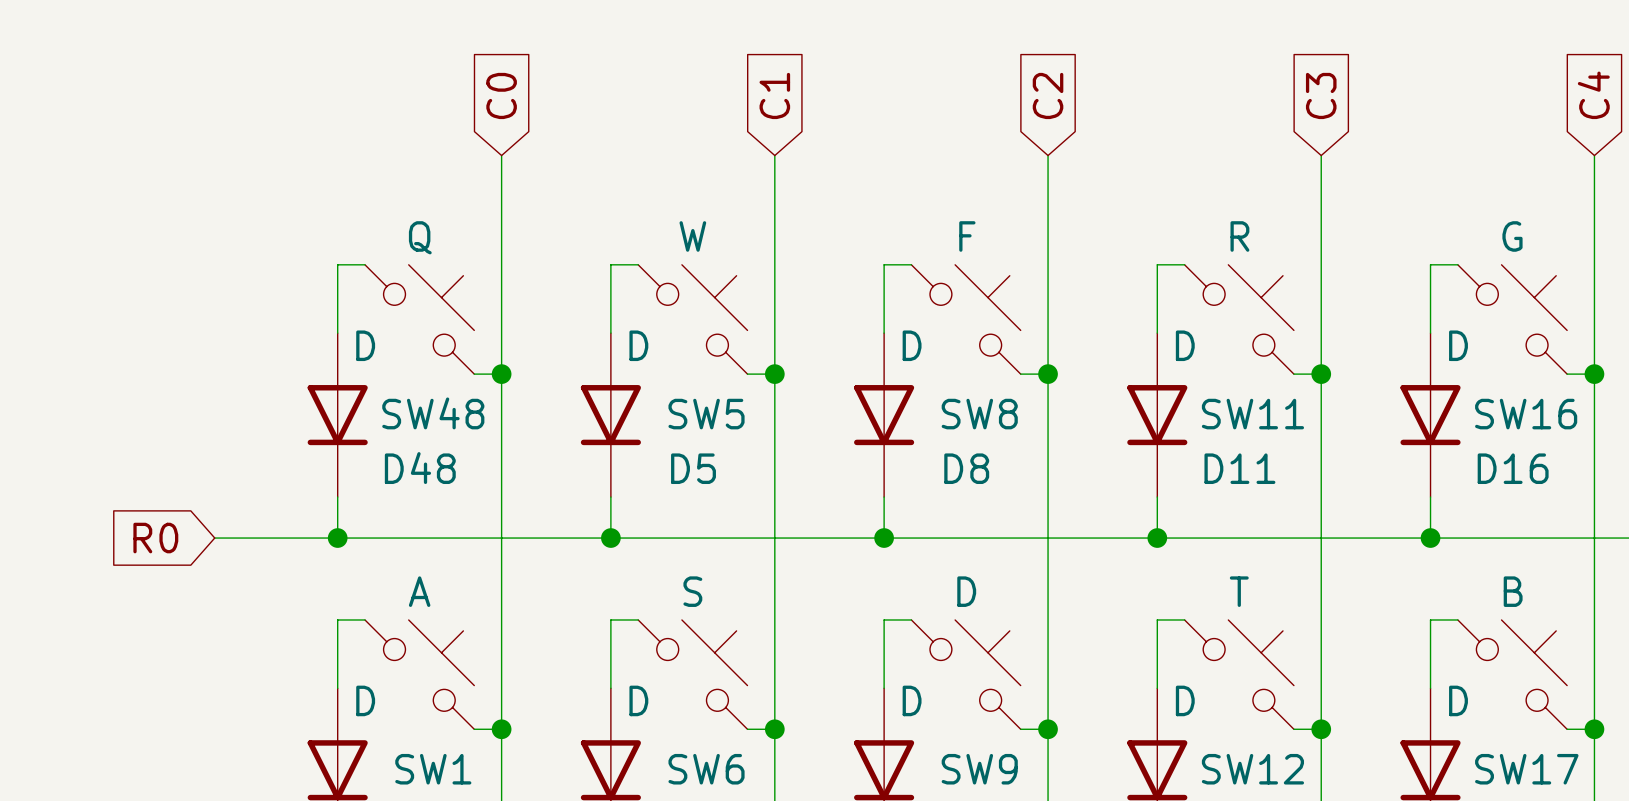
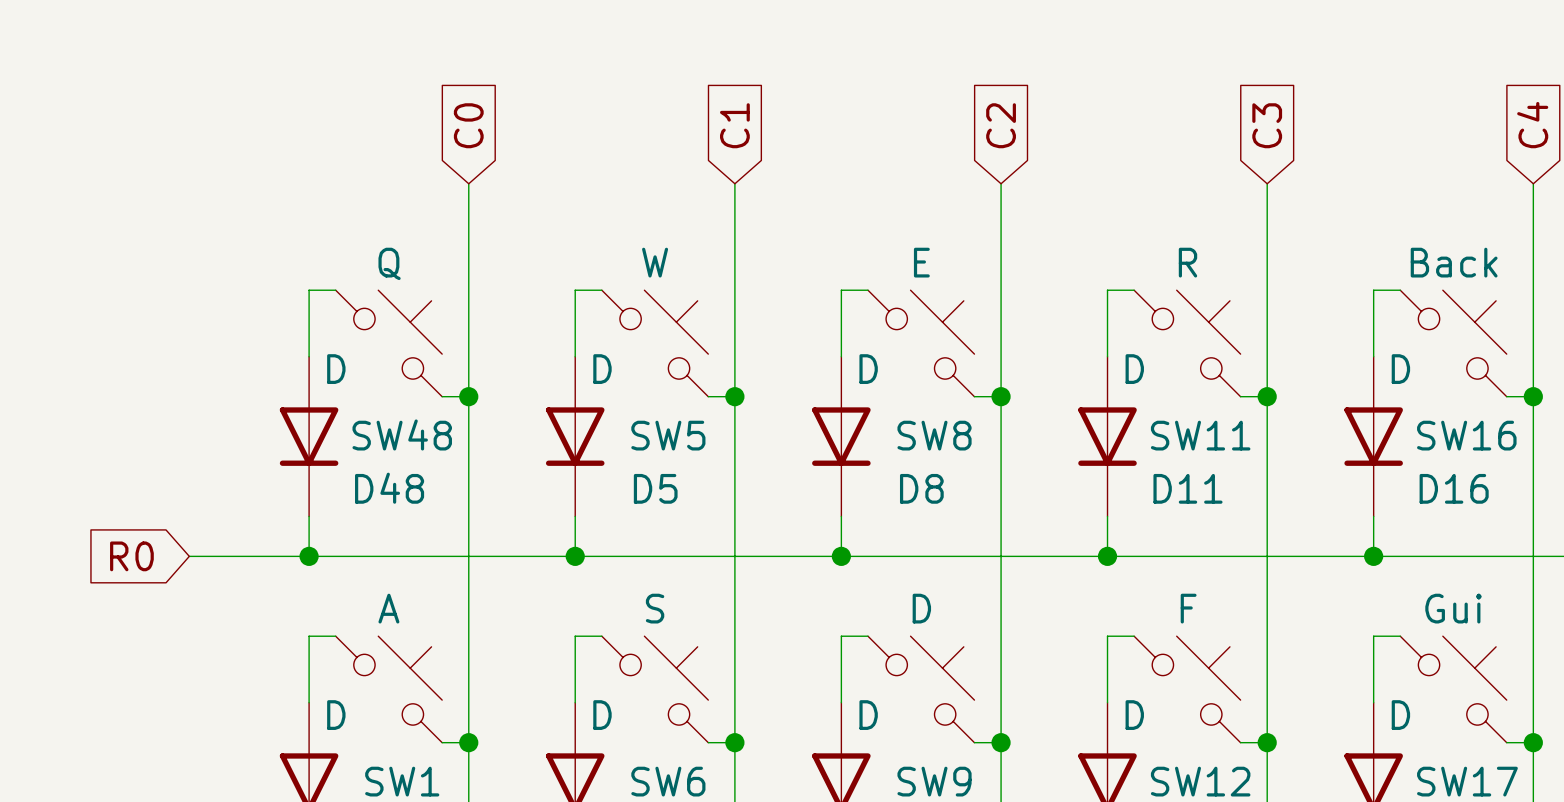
SW8 value: F (967, 236) -> E (921, 262)
SW16 value: G (1512, 236) -> Back (1454, 262)
SW12 value: T (1239, 591) -> F (1188, 608)
SW17 value: B (1513, 591) -> Gui (1453, 608)

